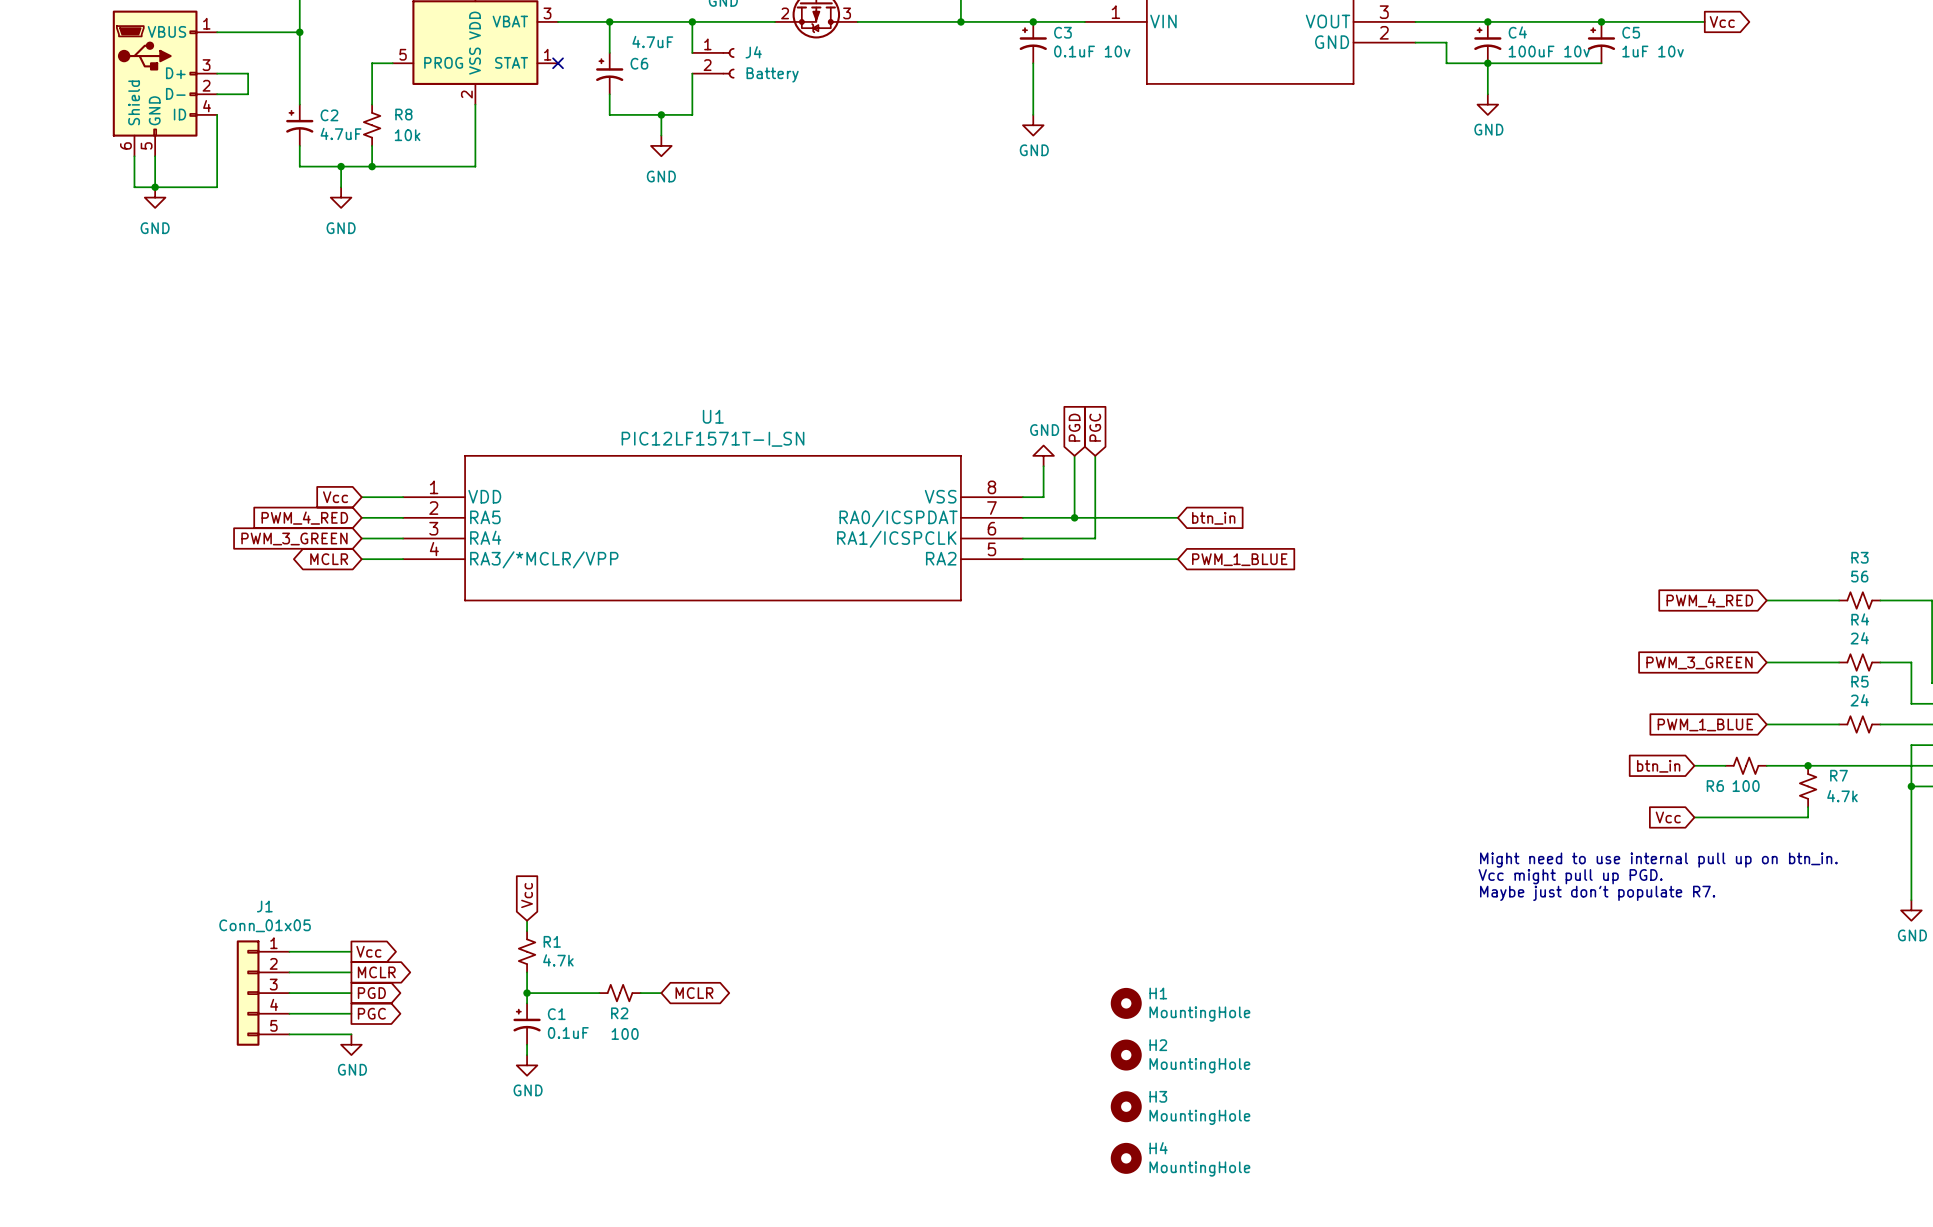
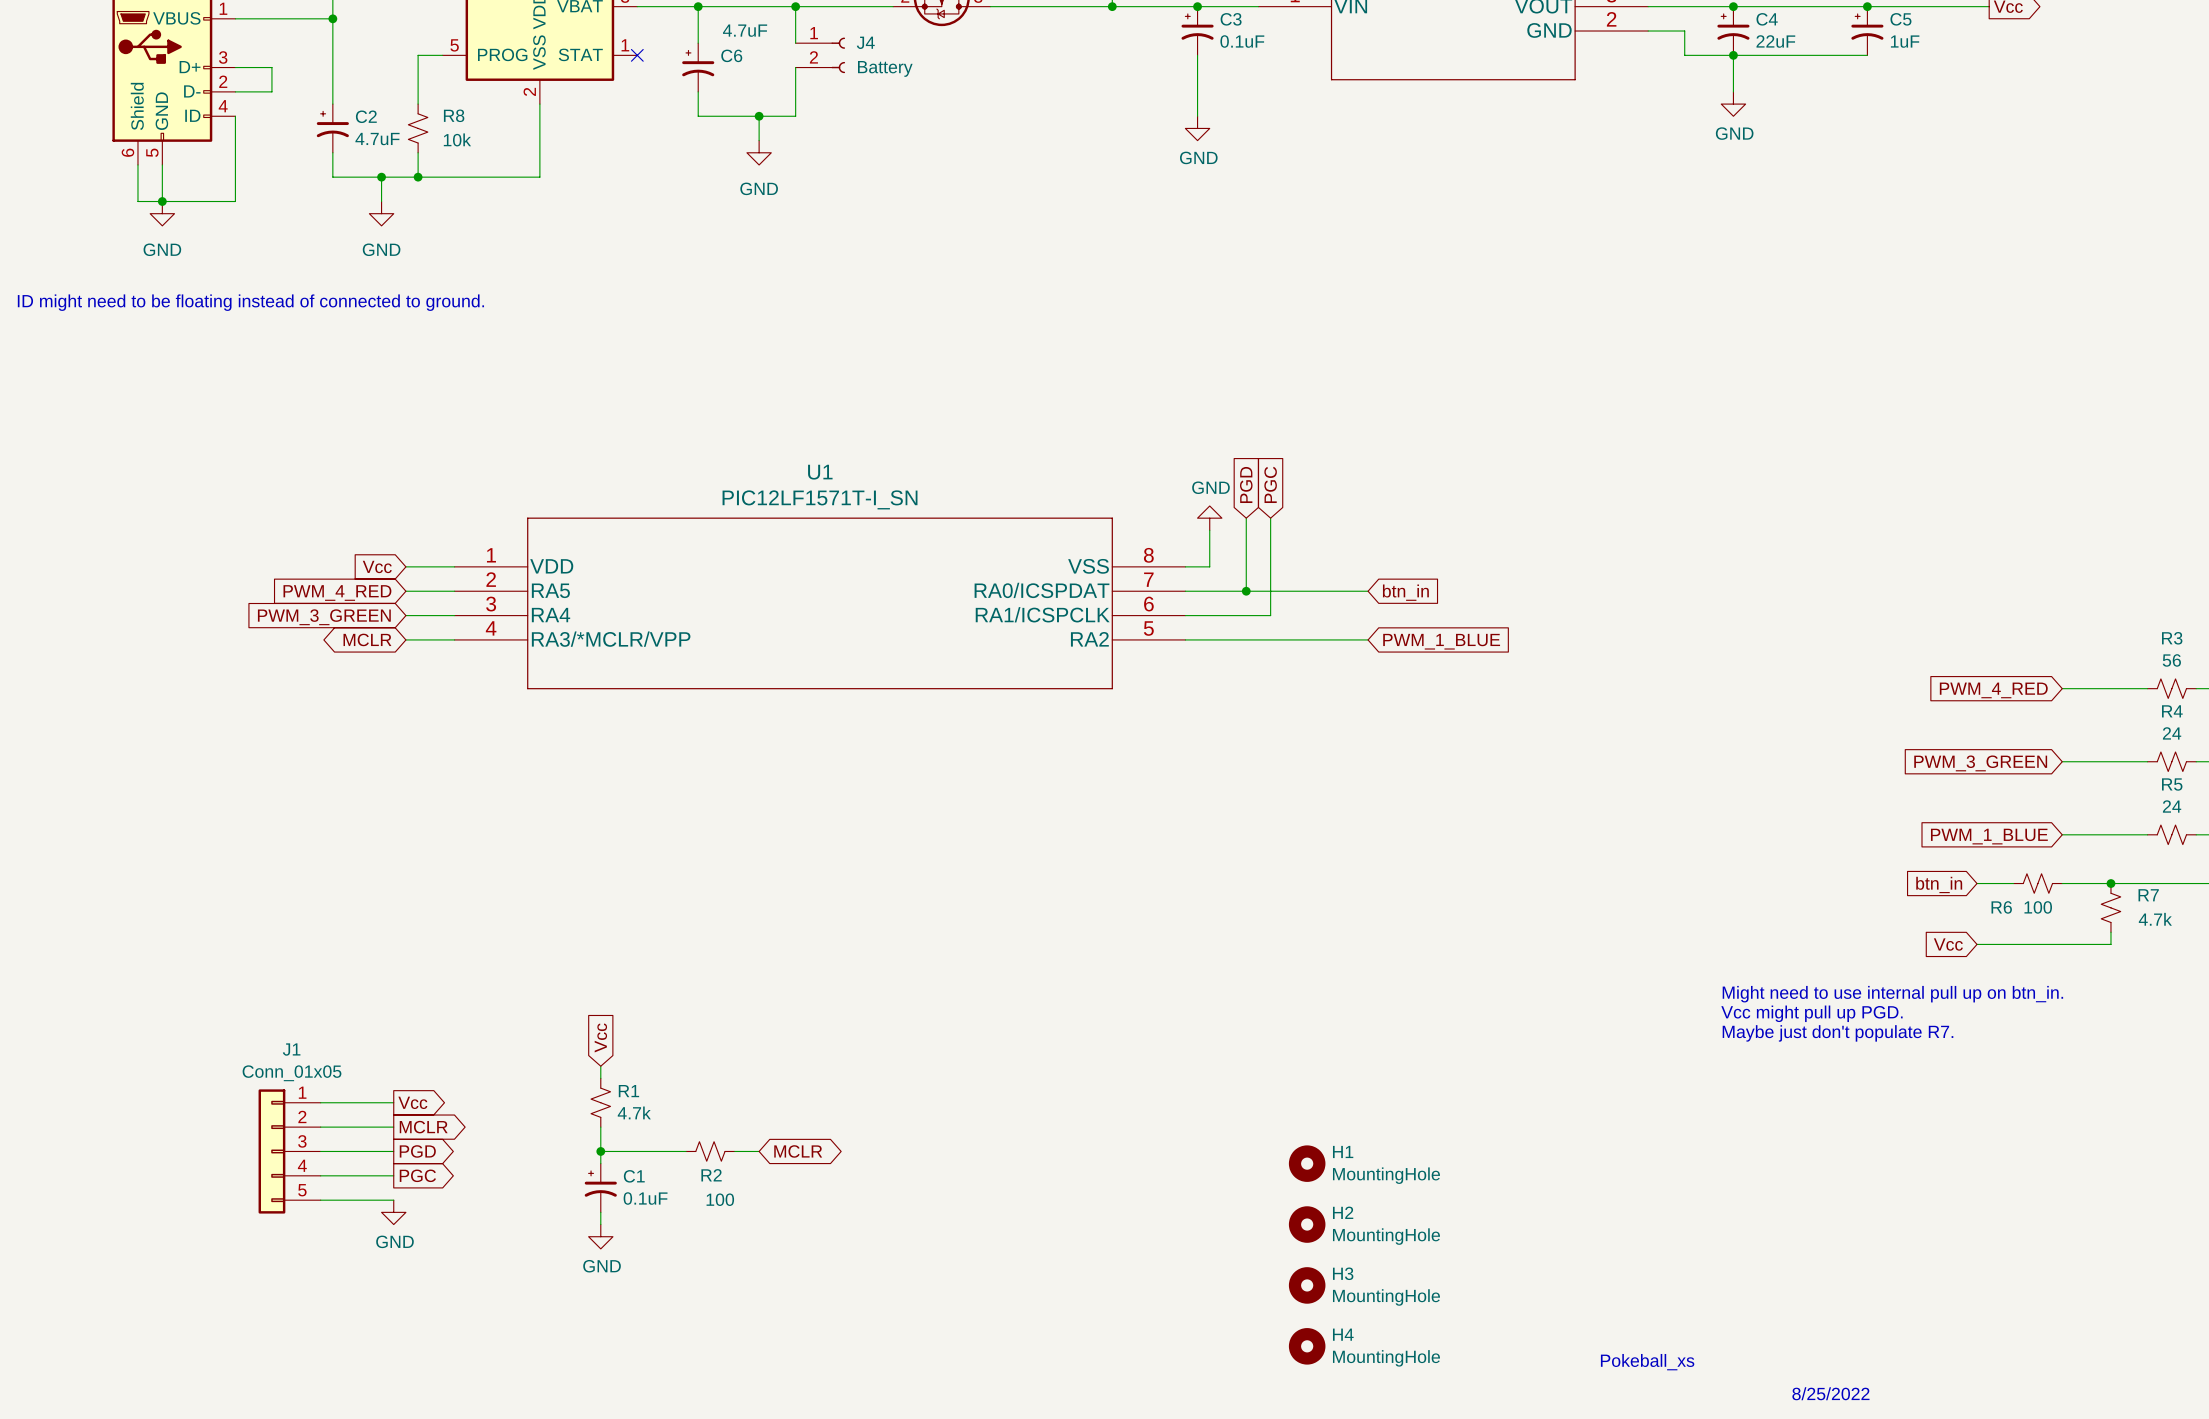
C3 value: 0.1uF 10v (1092, 51) -> 0.1uF (1242, 41)
C4 value: 100uF 10v (1549, 51) -> 22uF (1775, 41)
C5 value: 1uF 10v (1653, 51) -> 1uF (1905, 41)
text: none -> ID might need to be floating instead of connected to ground. (250, 302)
text: none -> Pokeball_xs (1647, 1362)
text: none -> 8/25/2022 (1830, 1393)

